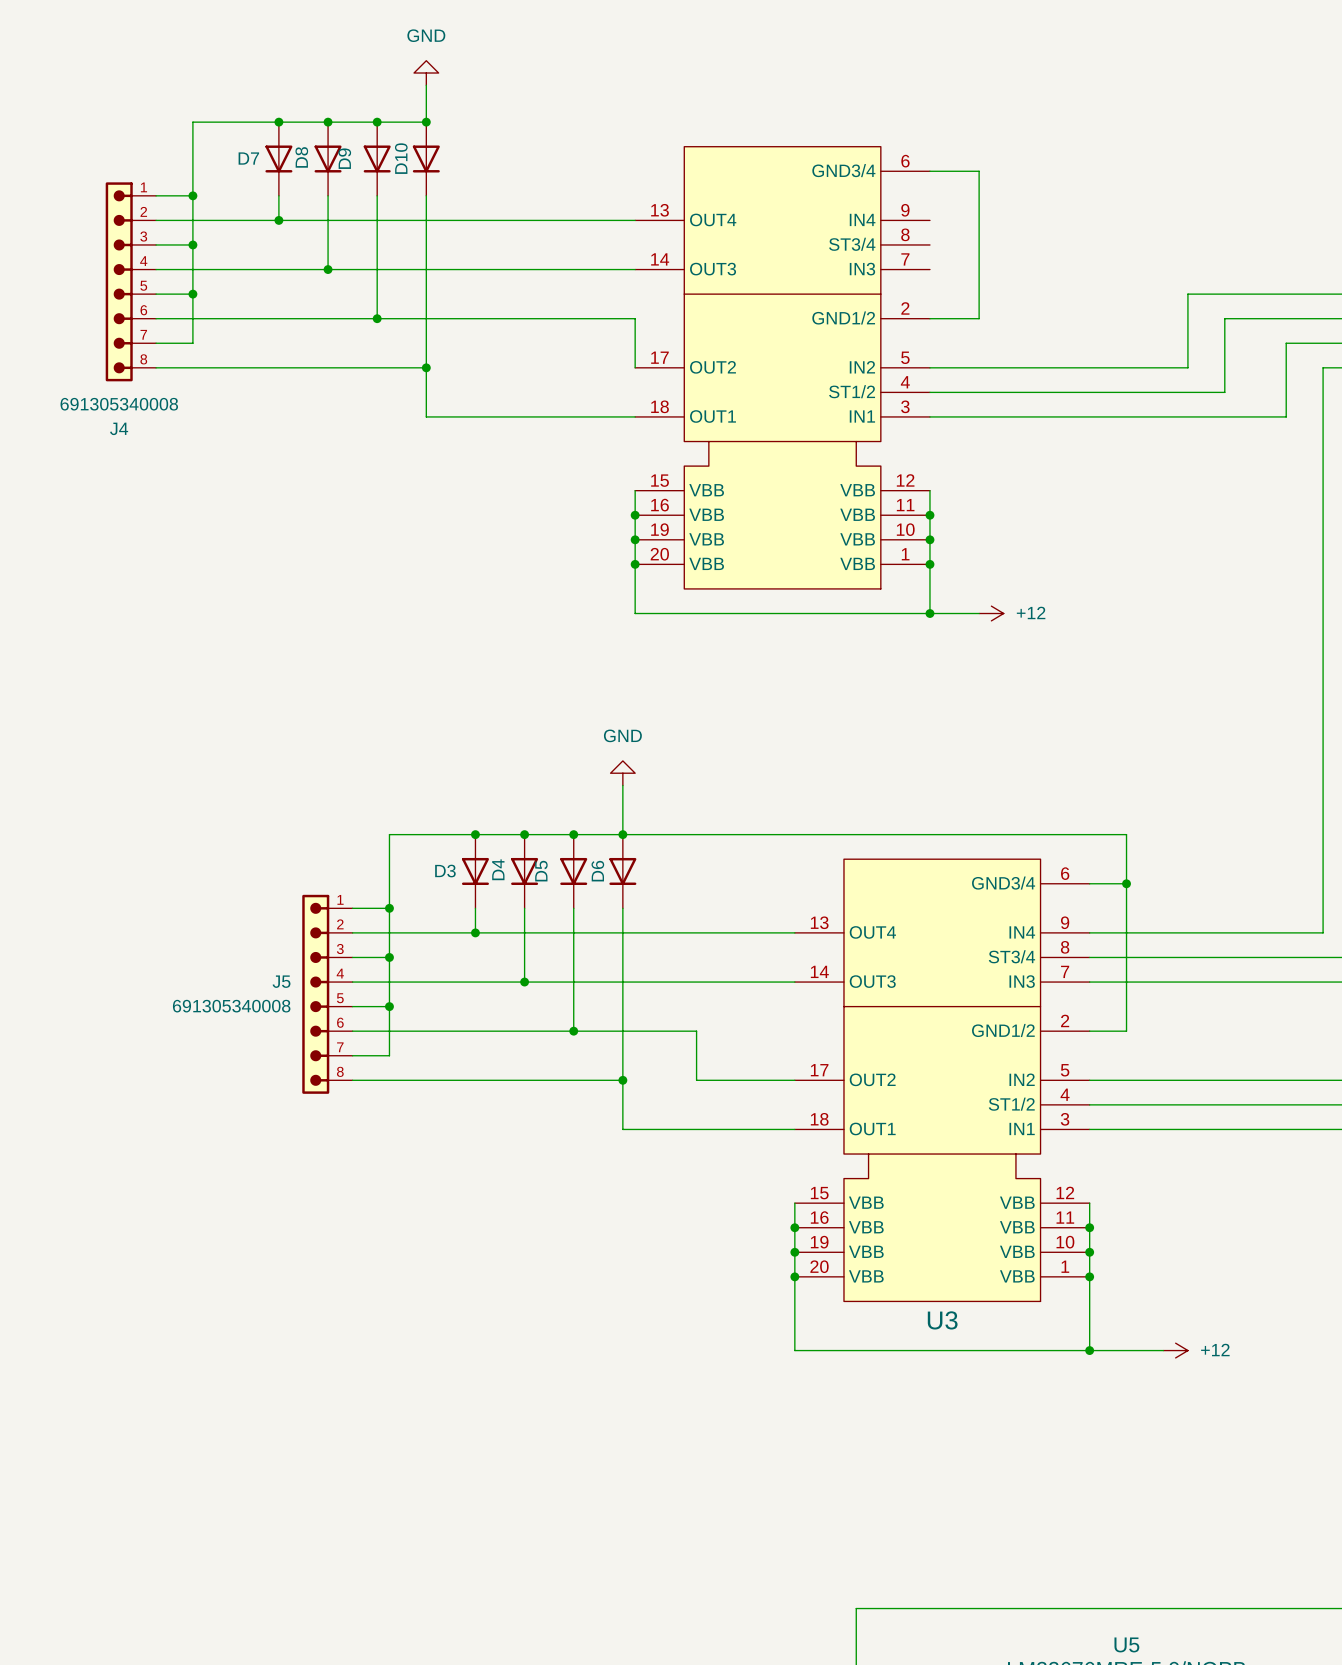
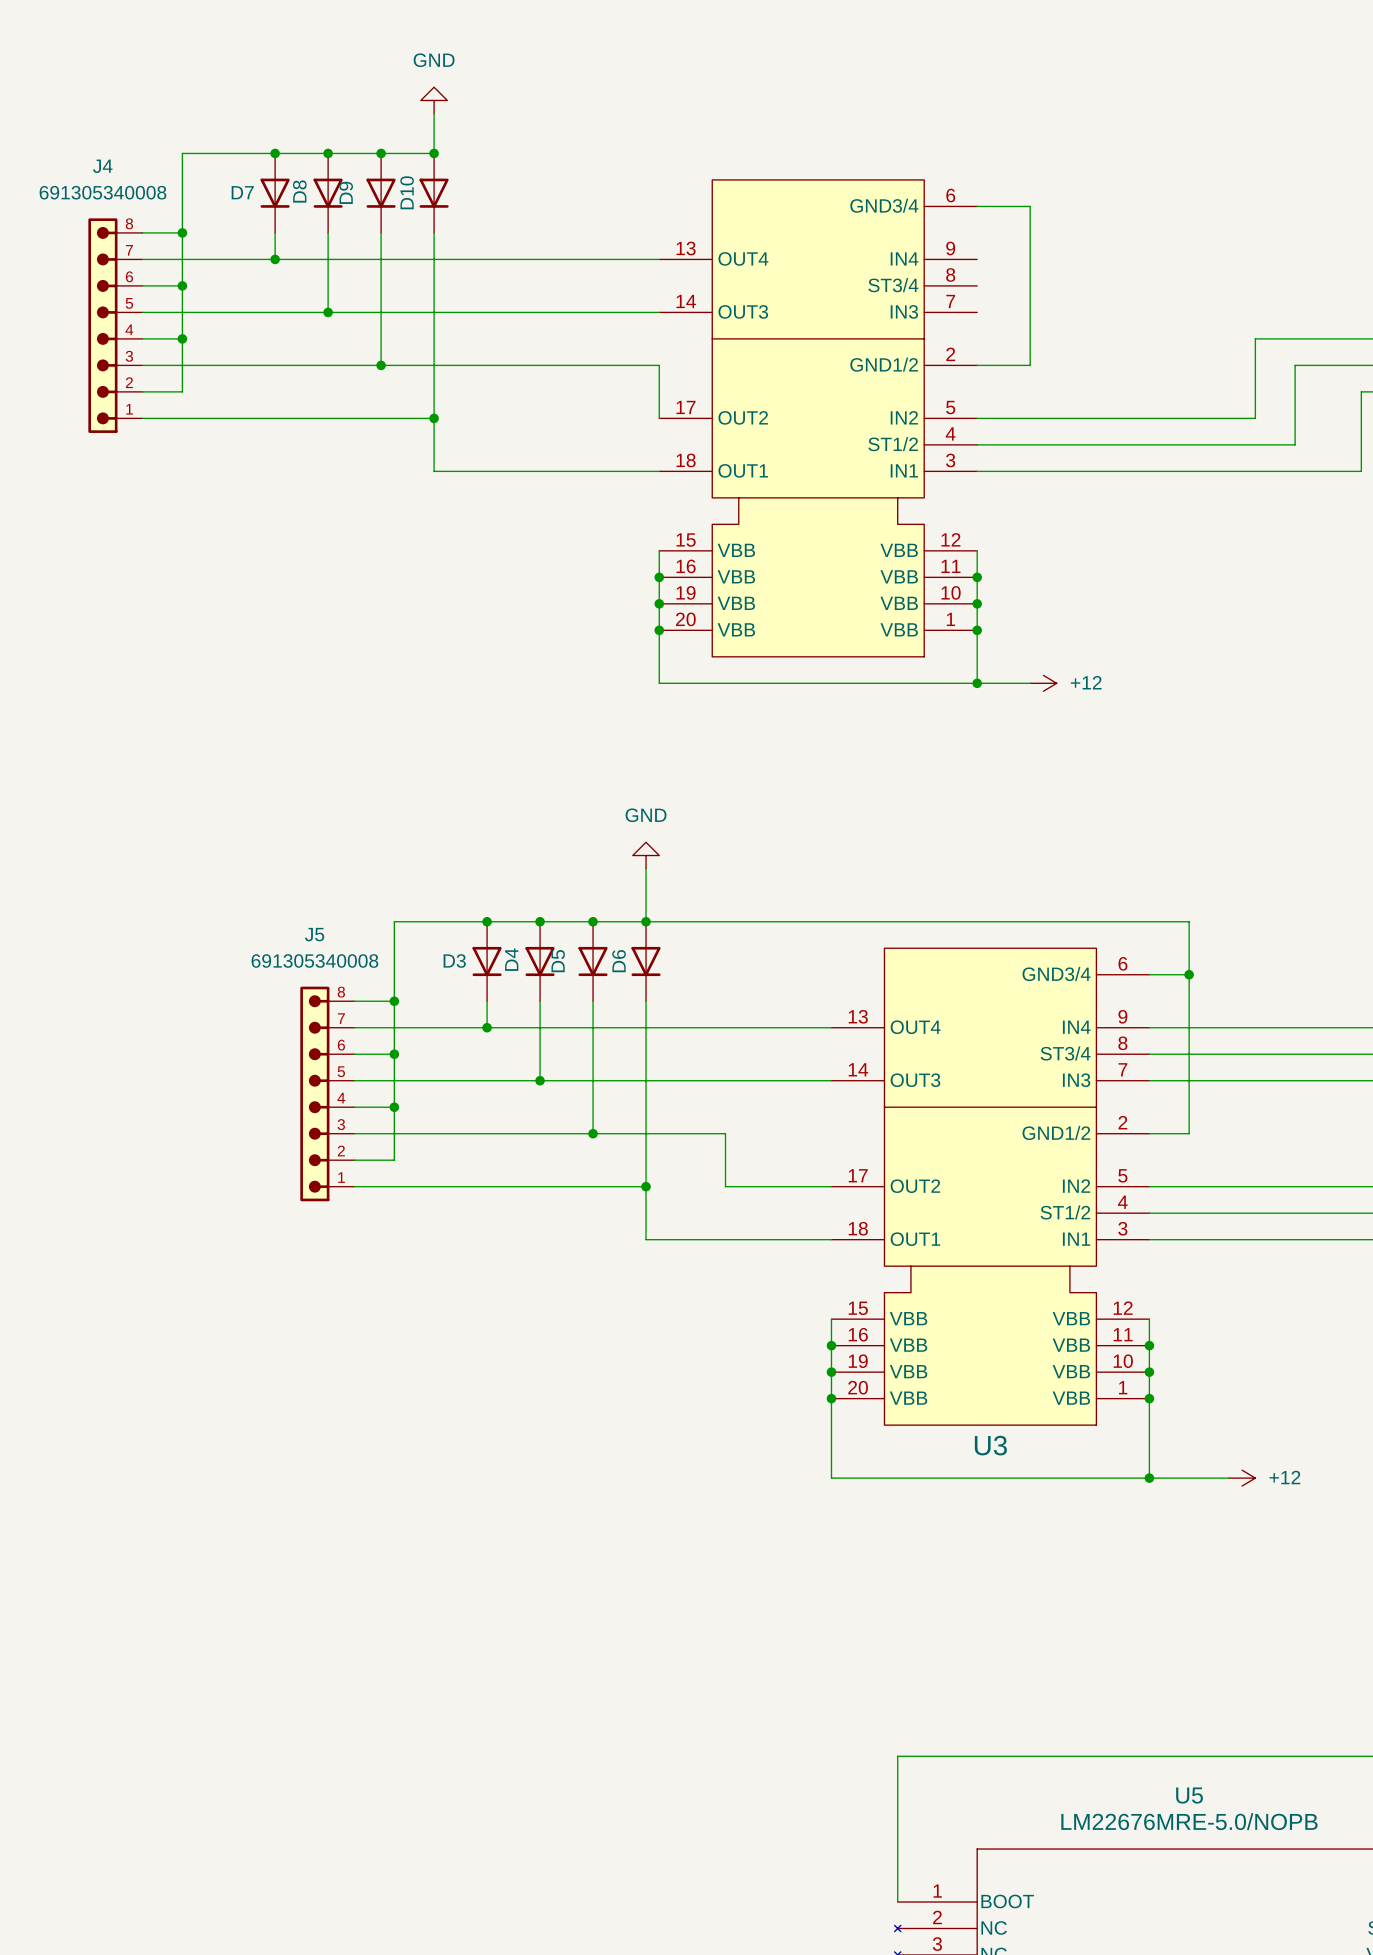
J4 flip: as is (119, 281) -> up-down (102, 325)
J5 name position: J5 (281, 981) -> J5 (314, 934)
J5 flip: as is (315, 994) -> up-down (314, 1093)
J5 value position: 691305340008 (231, 1006) -> 691305340008 (314, 960)

